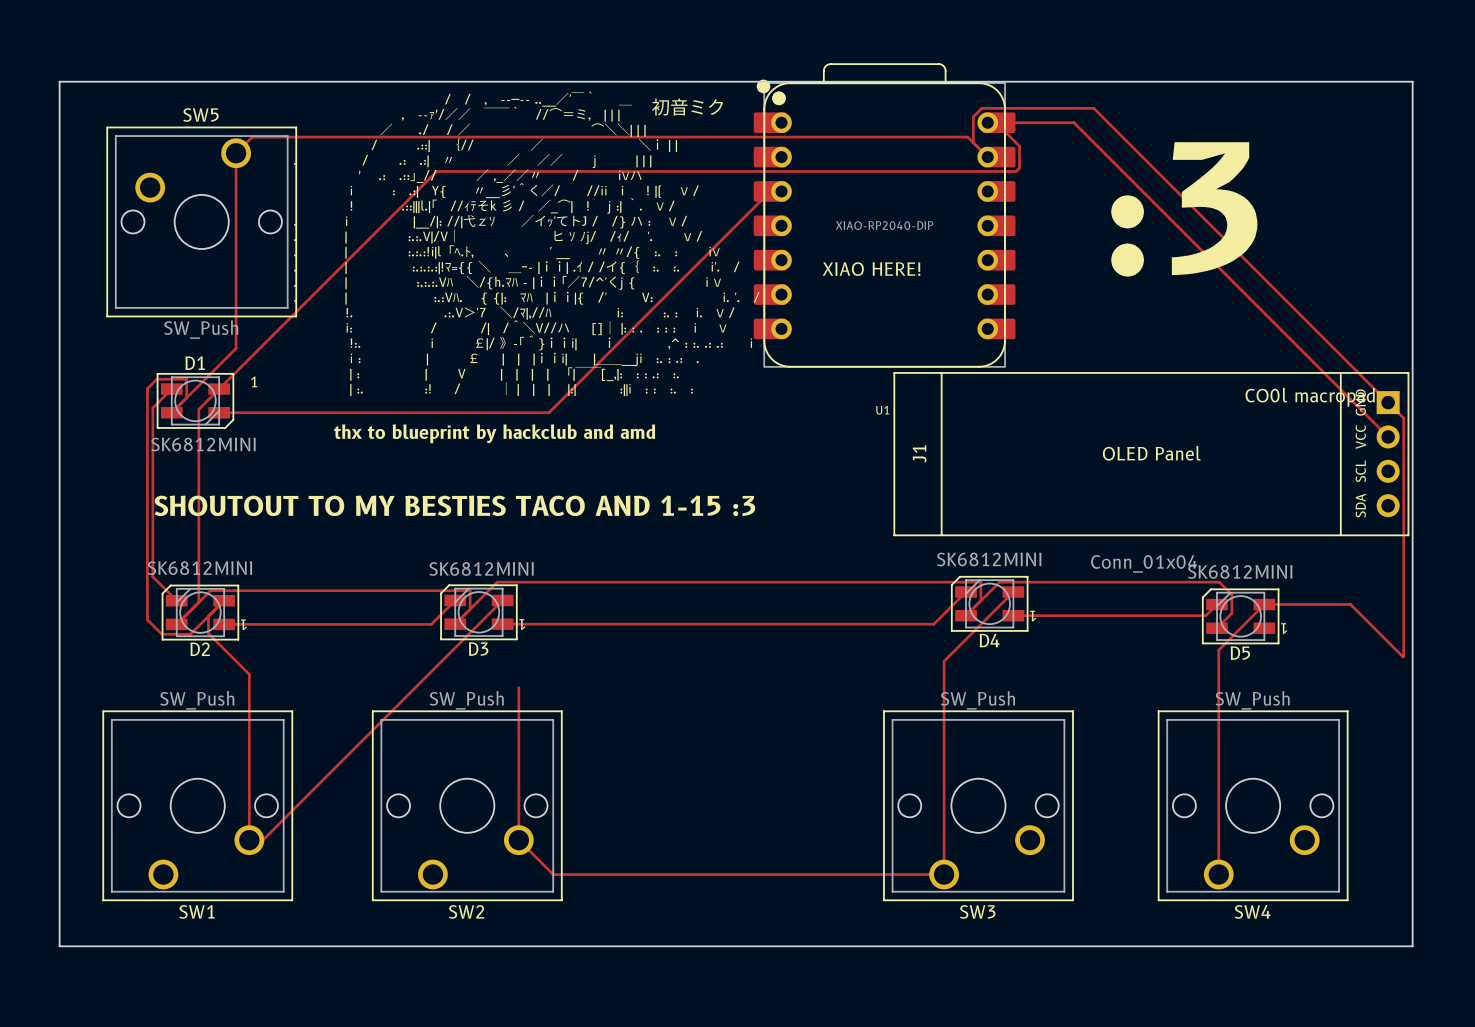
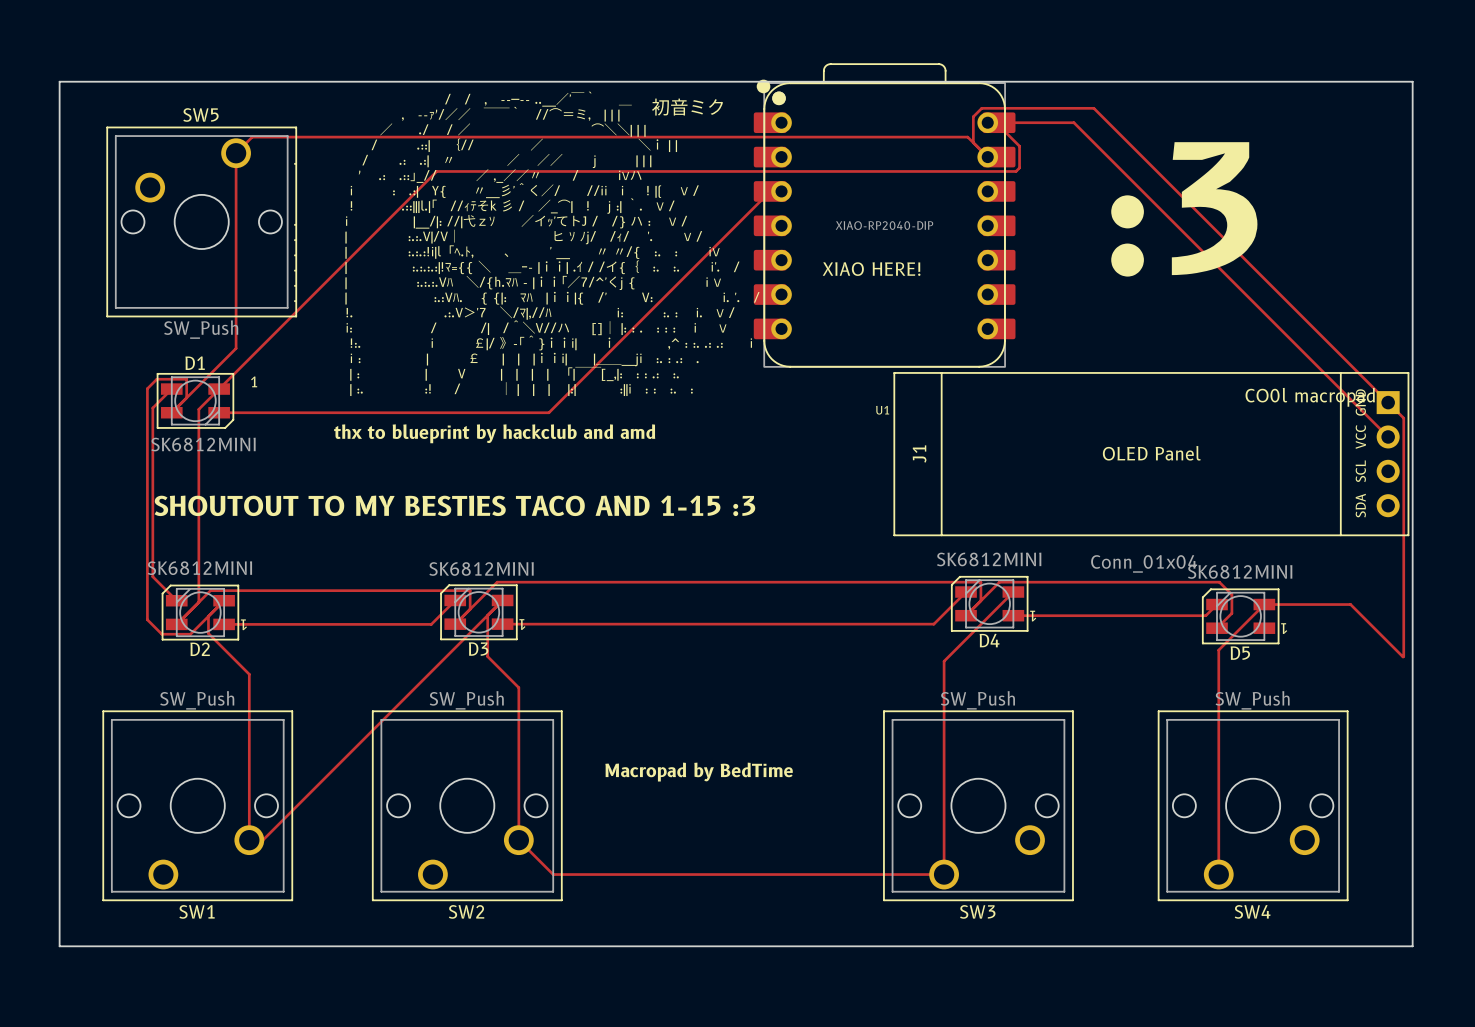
track: none -> (487, 615) (487, 656) (518, 687)
text: none -> Macropad by BedTime (699, 772)

